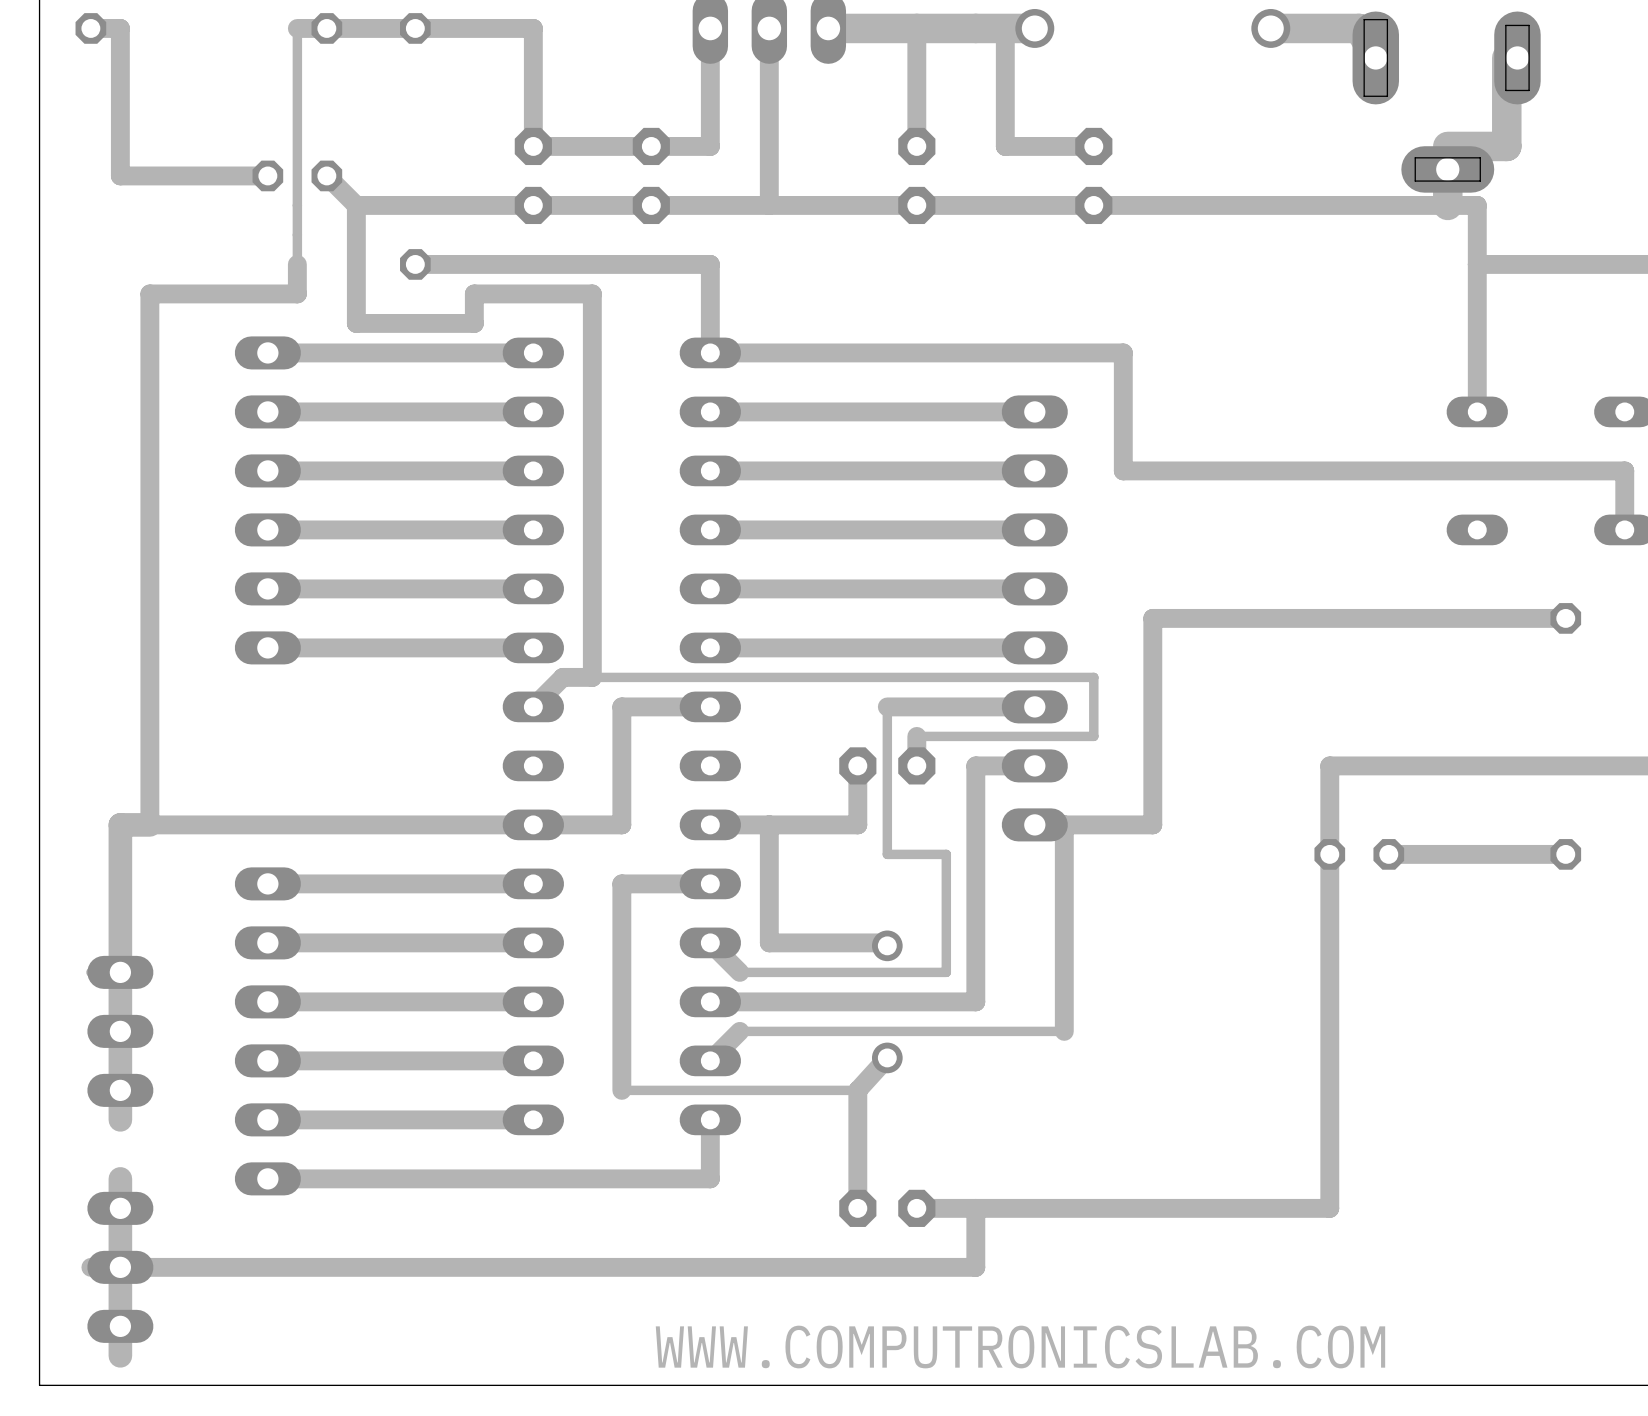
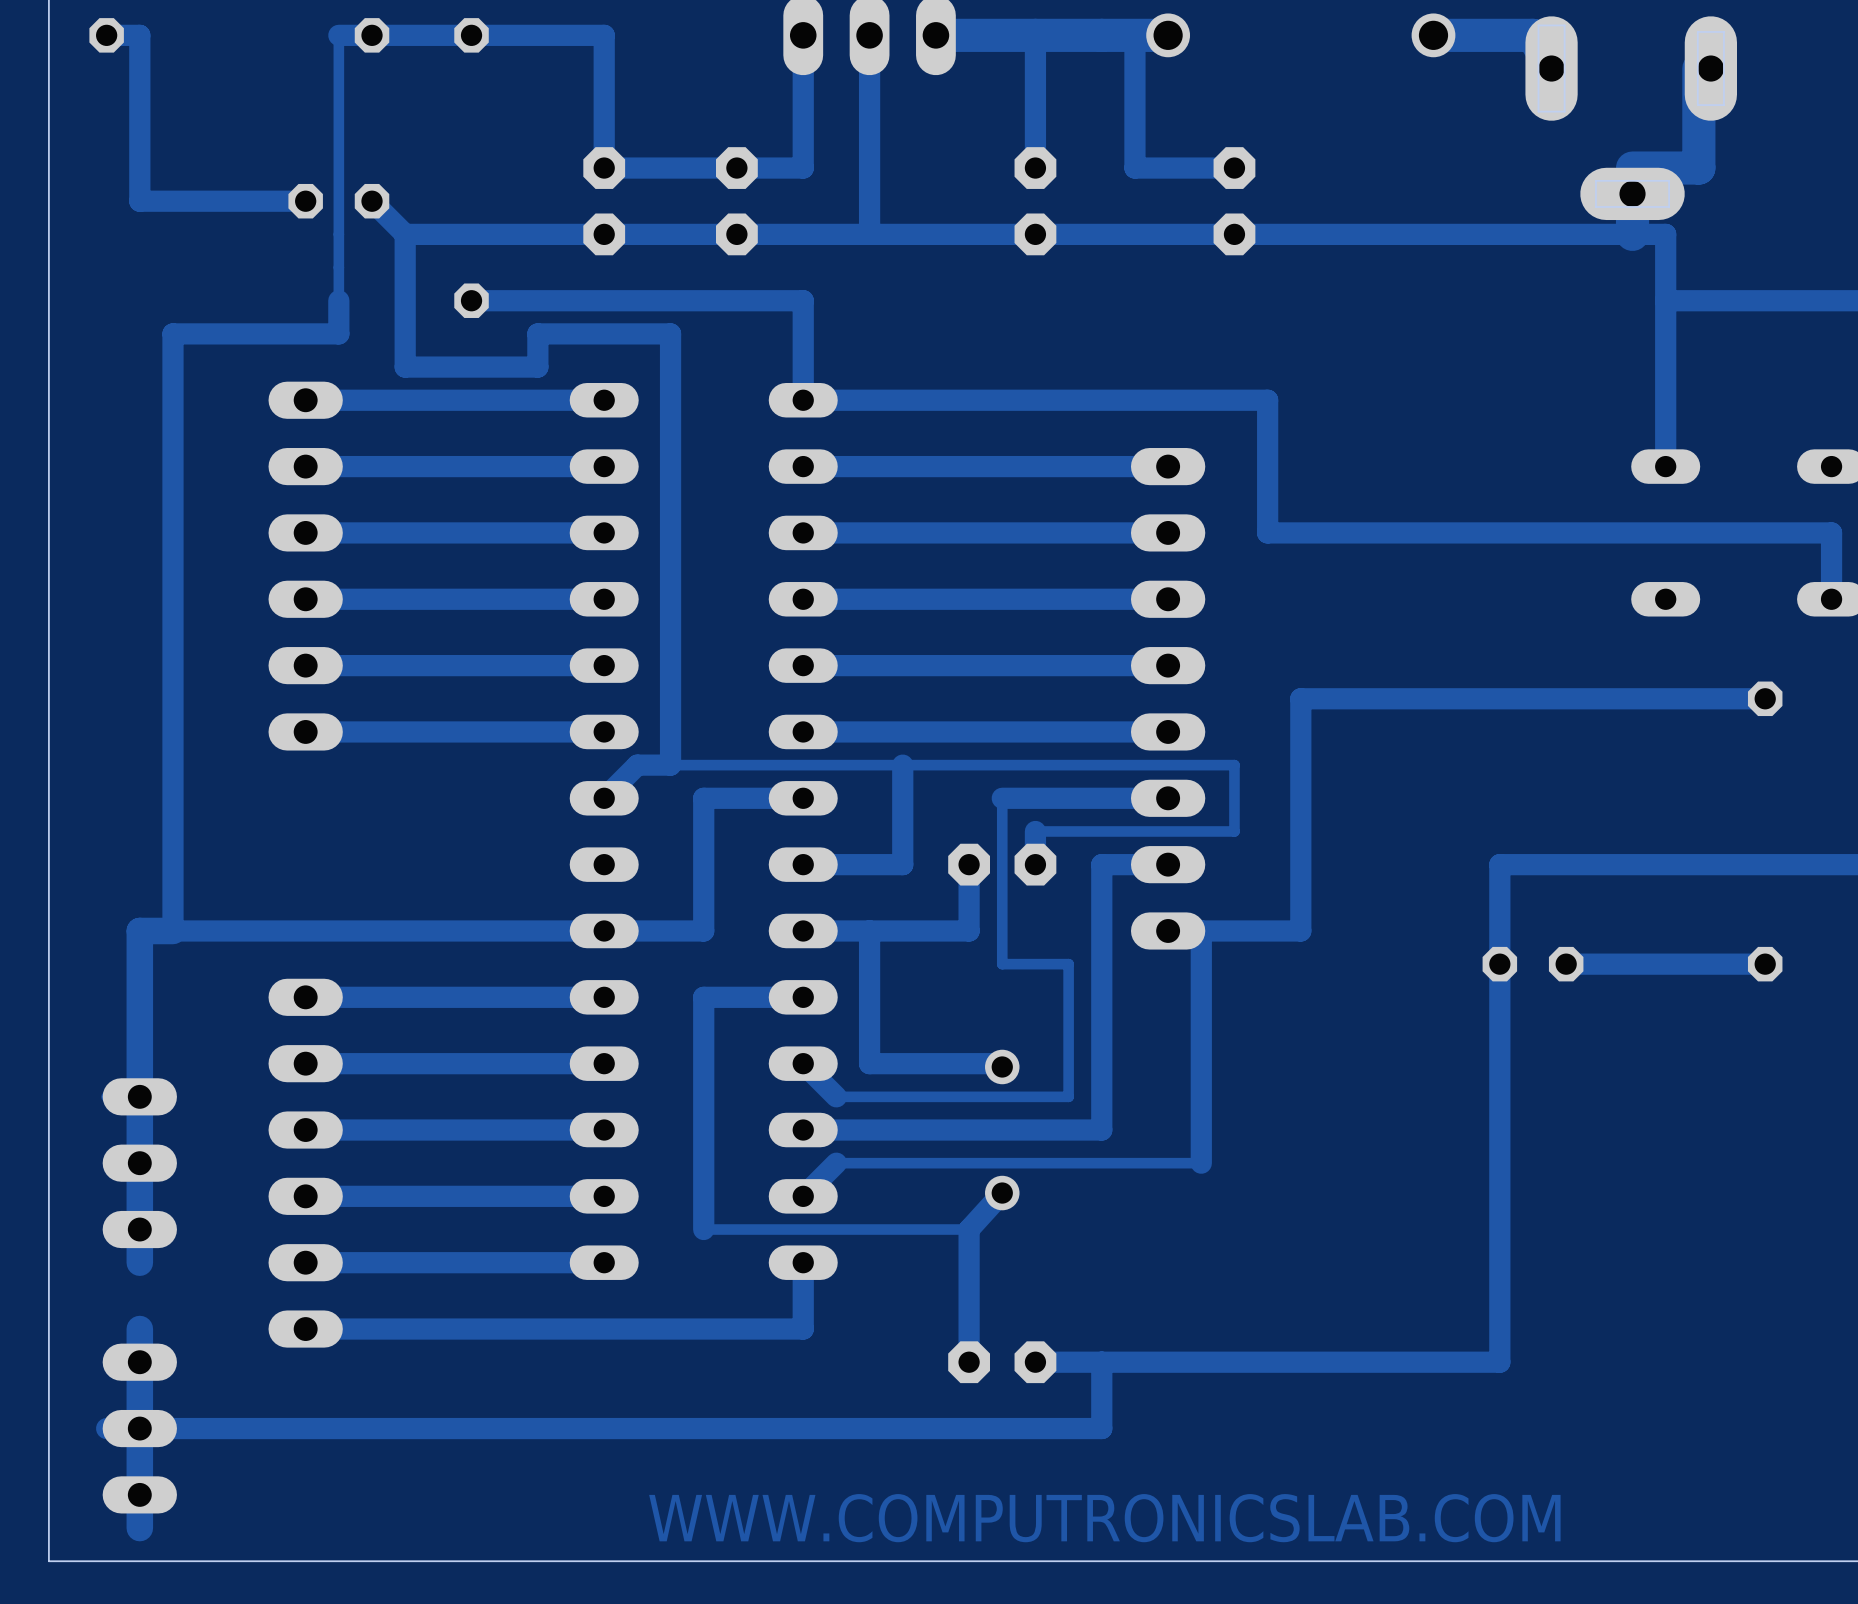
track: none -> (902, 765) (902, 864) (803, 864)

